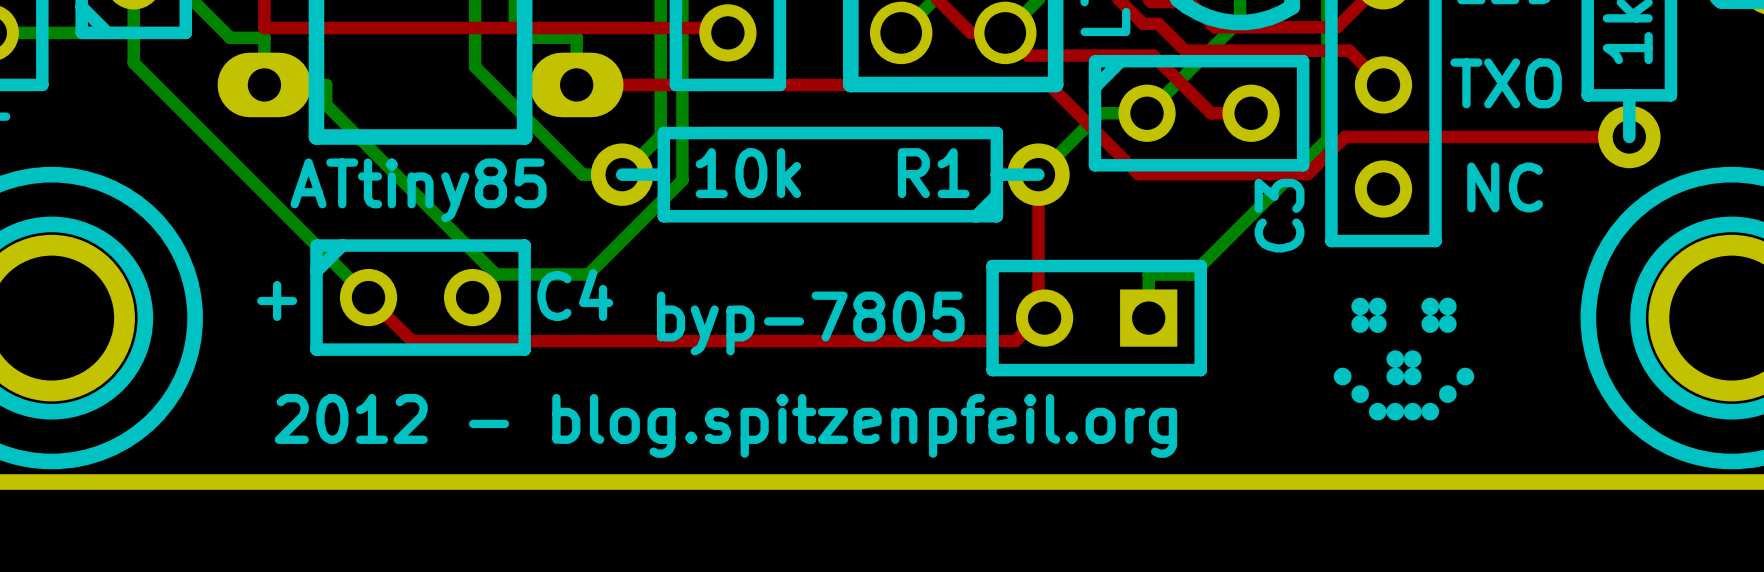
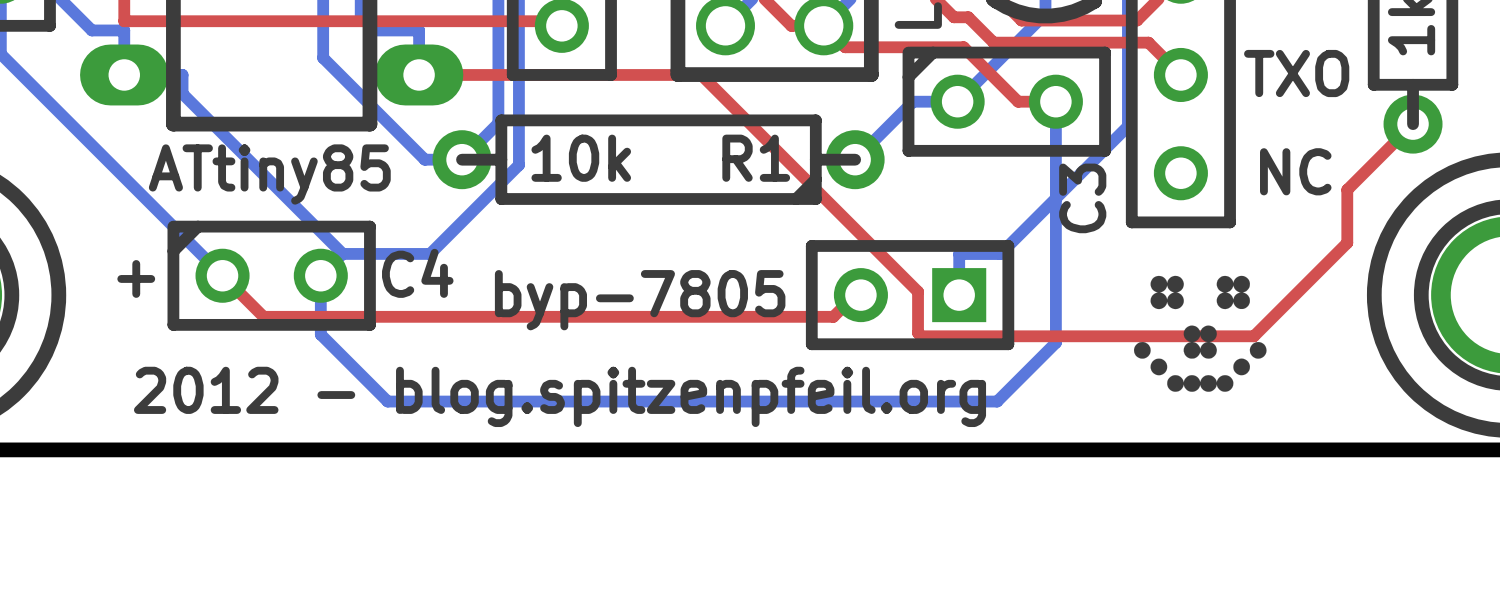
top track: (875, 84) (1049, 84) (1138, 174) (1307, 174) (1345, 136) (1629, 136) -> (701, 74) (918, 291) (918, 332) (921, 336) (1253, 336) (1347, 242) (1347, 189) (1413, 124)
bottom track: none -> (1055, 101) (1055, 342) (997, 401) (387, 401) (320, 334) (320, 275)
top track: (1038, 174) (1038, 318) -> none

